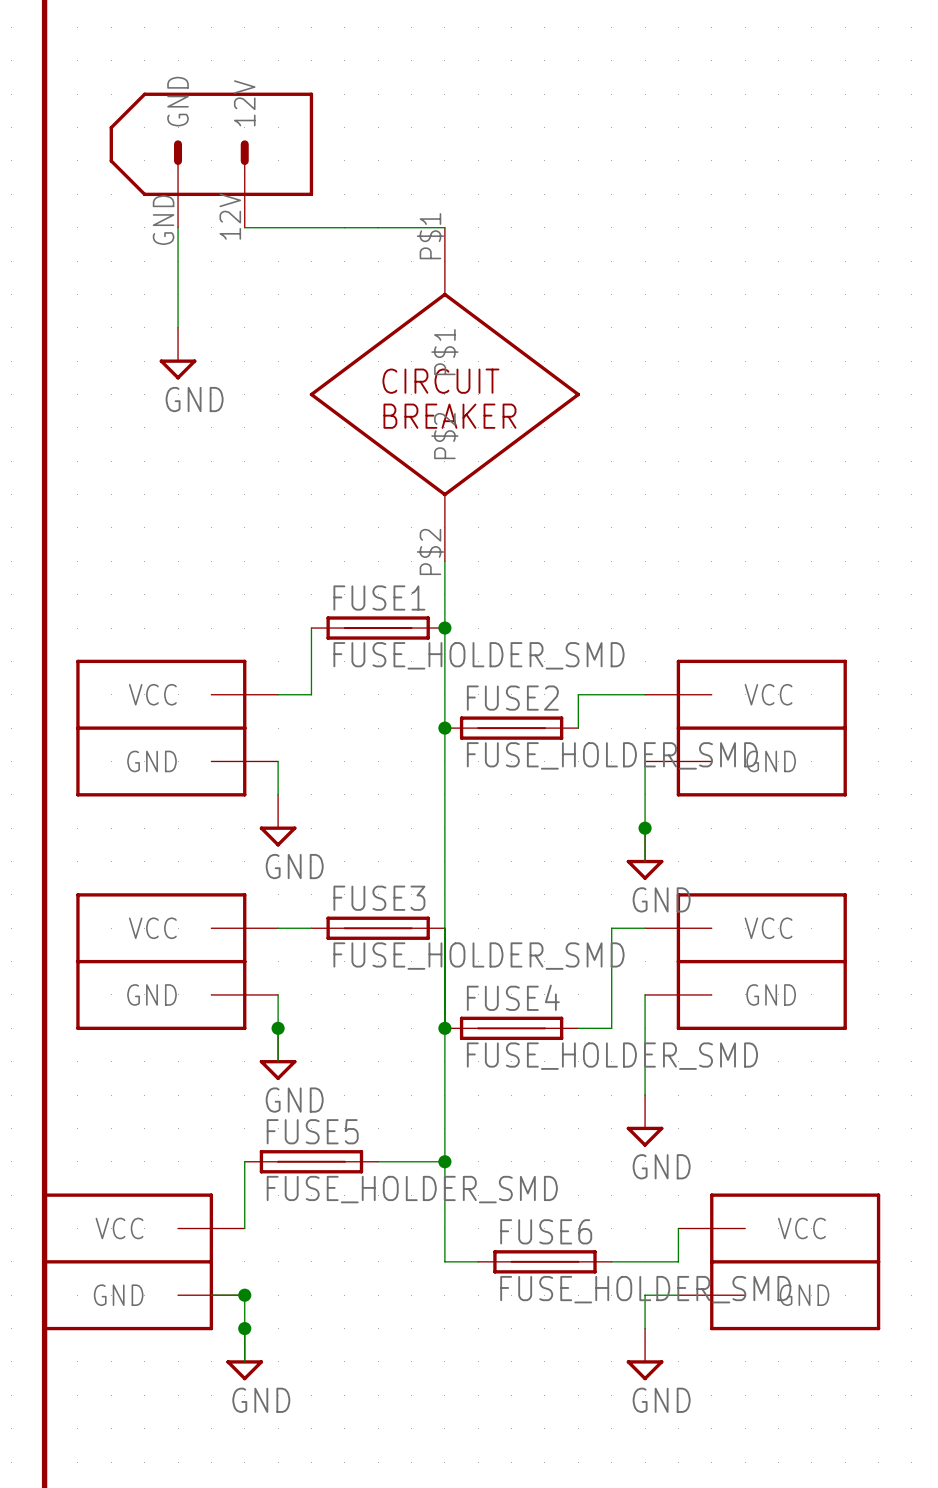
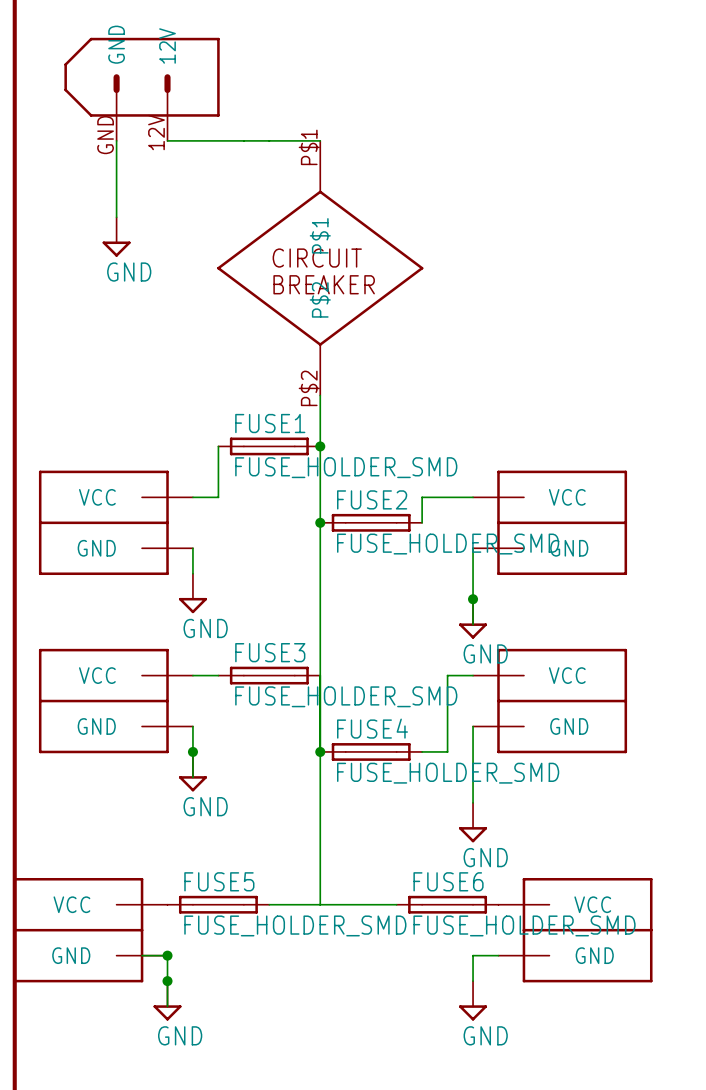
wire: (244, 1161) (244, 1228) -> none
FUSE5 position: (311, 1161) -> (218, 904)
wire: (378, 1161) (444, 1161) -> none
junction: (444, 1161) -> none
wire: none -> (269, 904) (396, 904)
wire: (444, 1228) (444, 1261) (478, 1261) -> none
wire: (678, 1228) (678, 1261) (611, 1261) -> none
FUSE6 position: (544, 1261) -> (447, 904)

